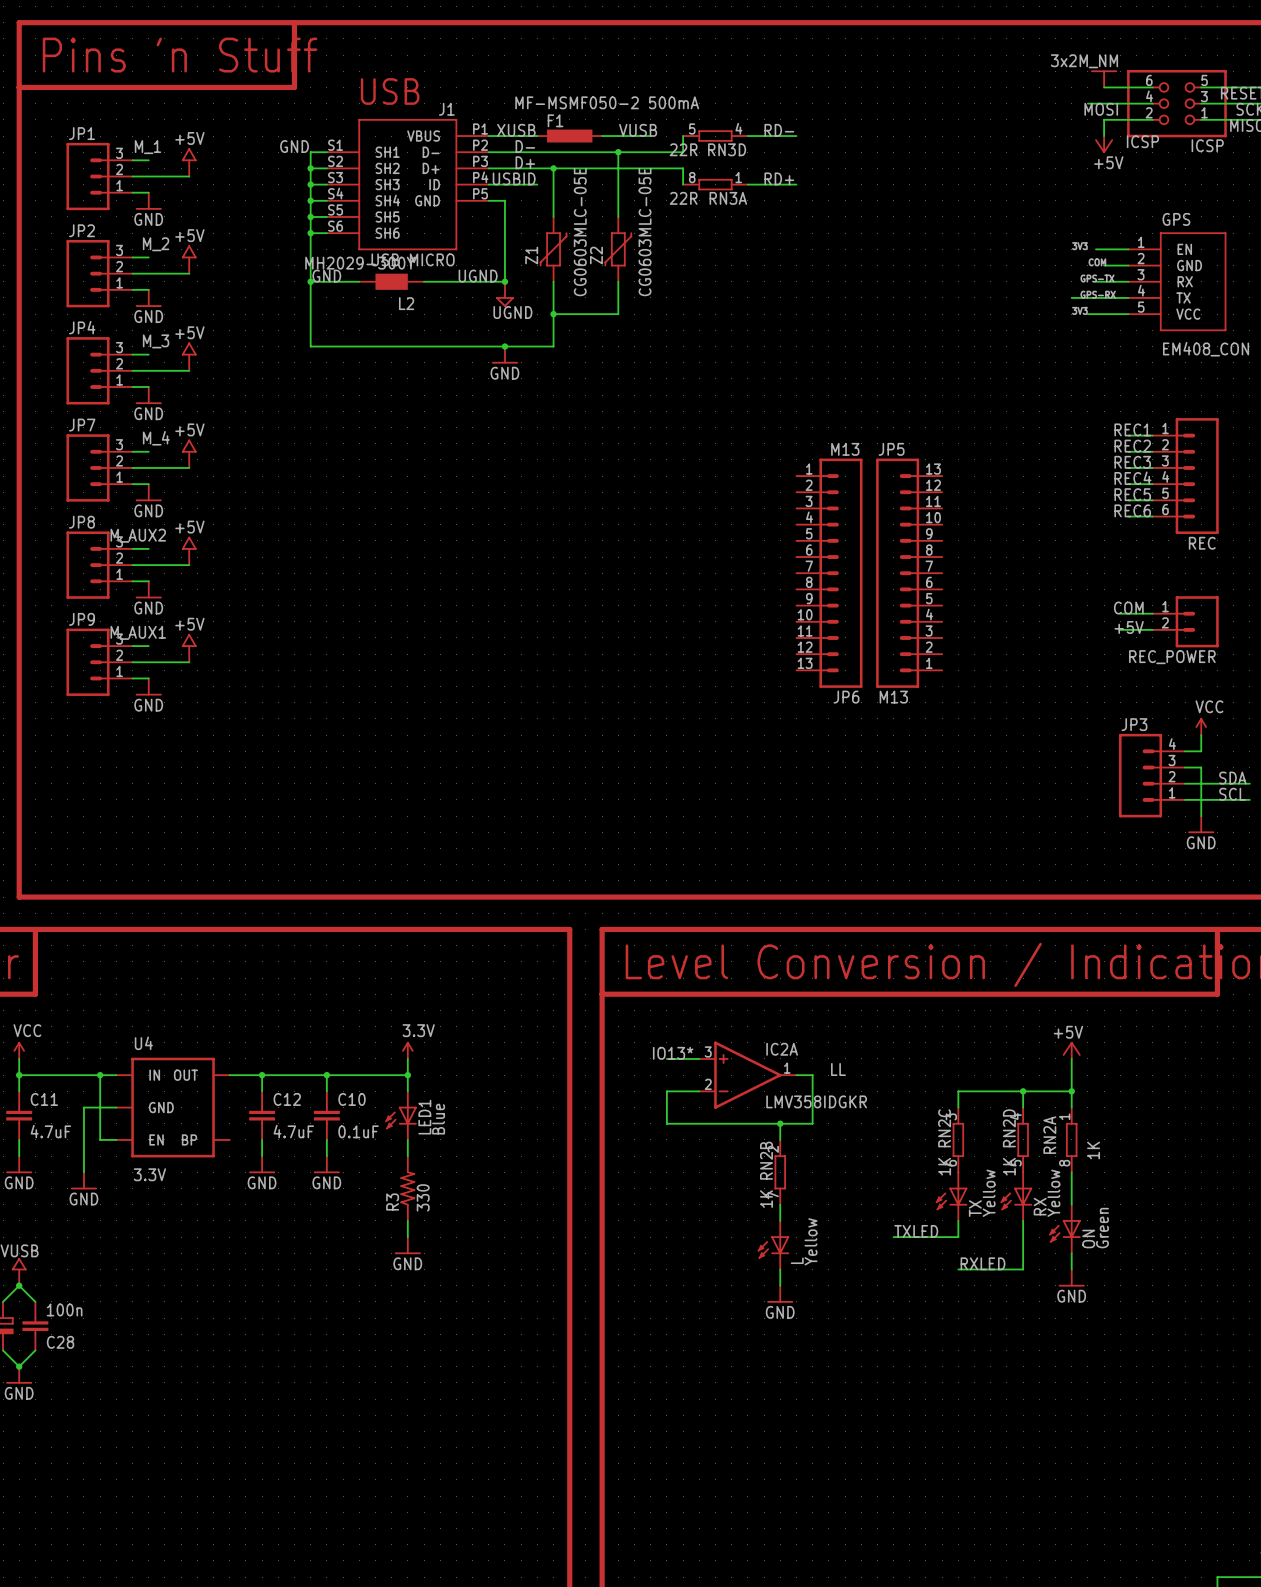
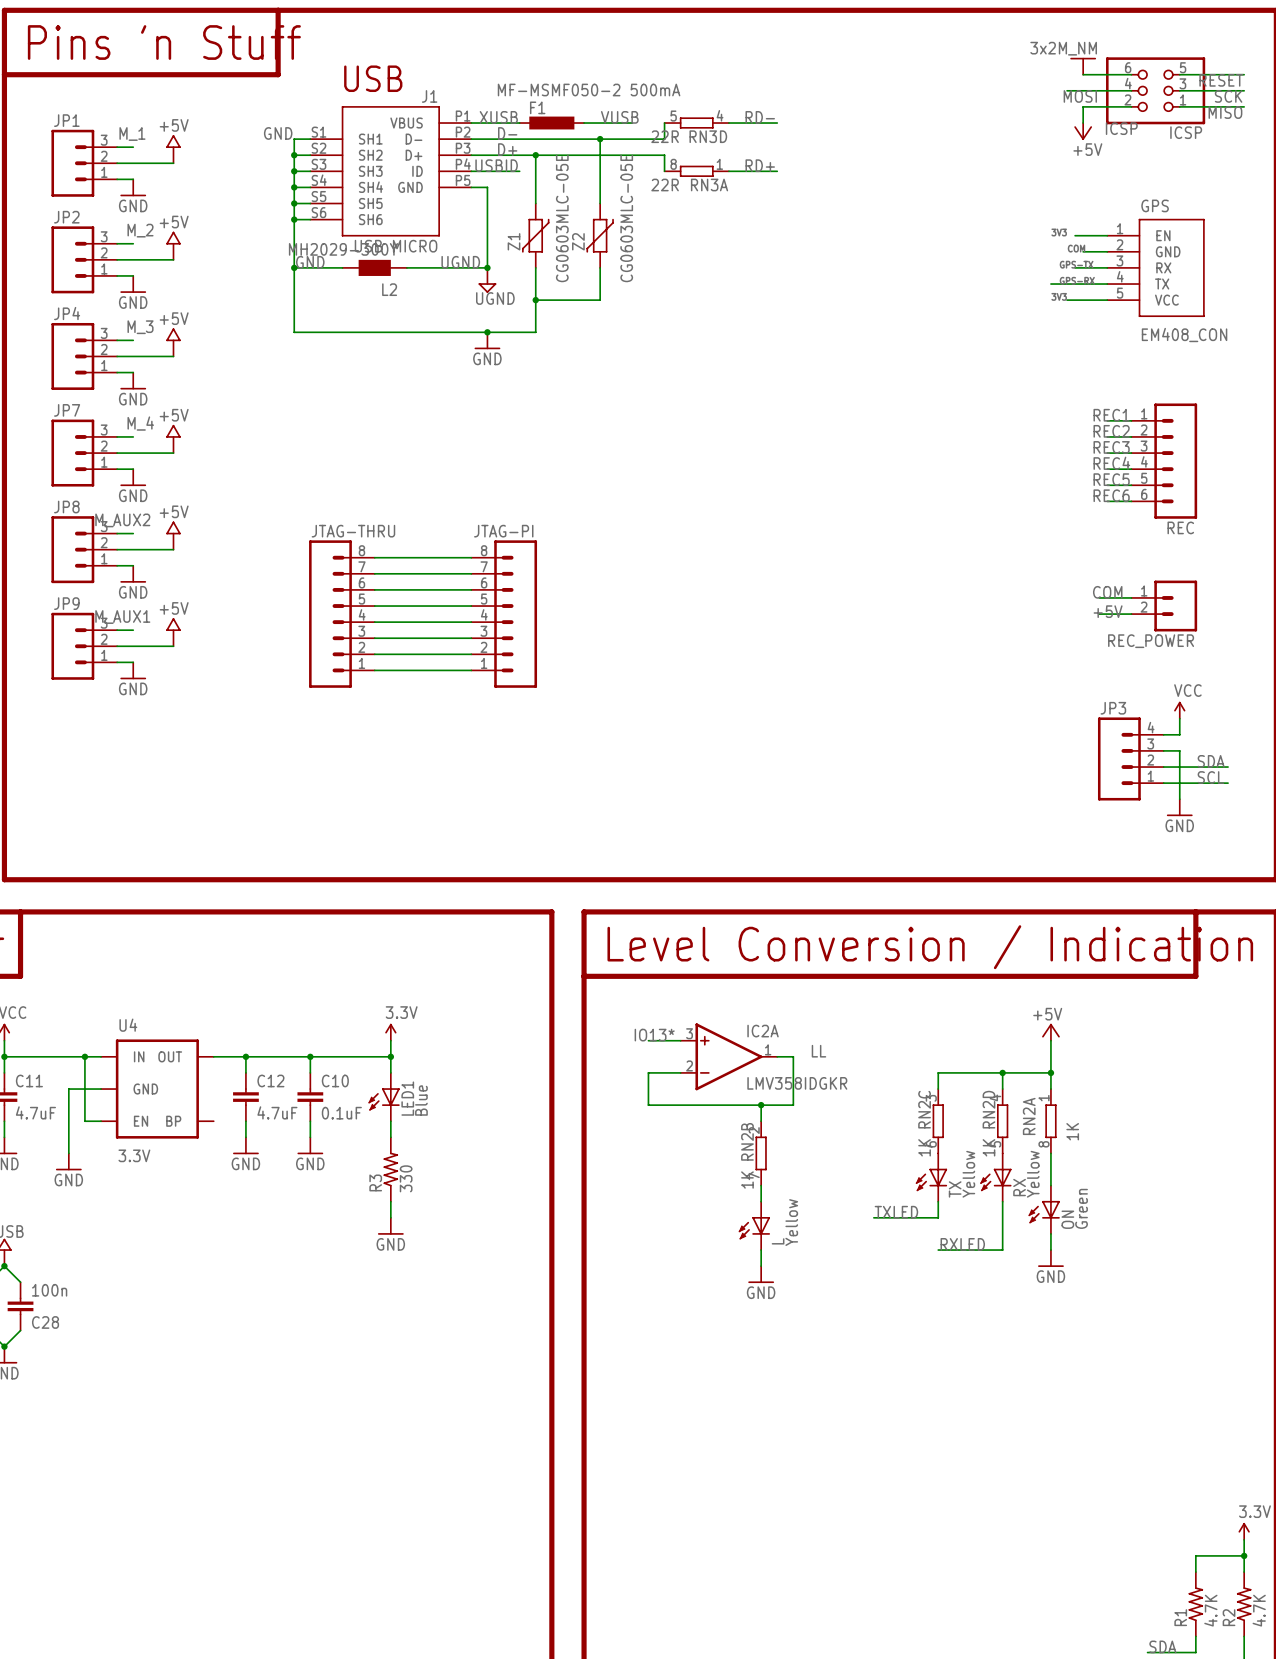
wire: none -> (374, 557) (471, 557)
JP6: M13 (829, 573) -> none
JP5: M13 (909, 573) -> none
wire: none -> (374, 573) (471, 573)
wire: none -> (374, 589) (471, 589)
wire: none -> (374, 606) (471, 606)
JTAG-THRU: none -> (341, 614)
JTAG-PI: none -> (504, 614)
wire: none -> (374, 622) (471, 622)
wire: none -> (374, 638) (471, 638)
wire: none -> (374, 654) (471, 654)
wire: none -> (374, 670) (471, 670)

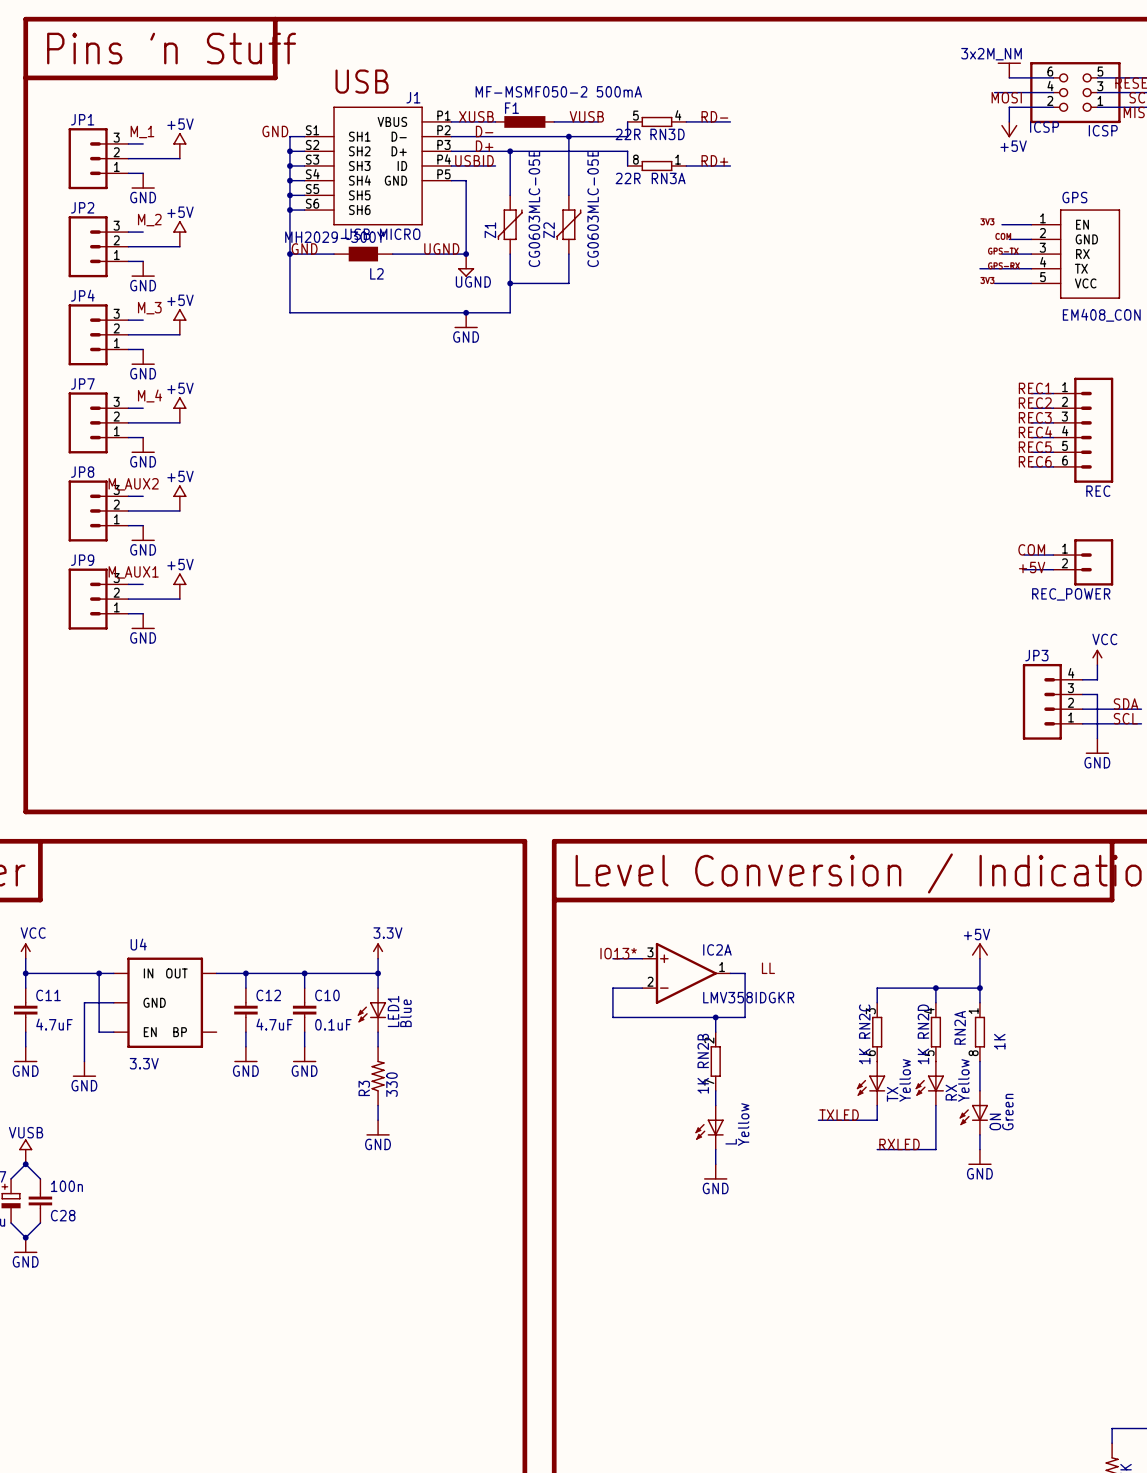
wire: (374, 557) (471, 557) -> none
wire: (374, 573) (471, 573) -> none
wire: (374, 589) (471, 589) -> none
wire: (374, 606) (471, 606) -> none
JTAG-THRU: (341, 614) -> none
JTAG-PI: (504, 614) -> none
wire: (374, 622) (471, 622) -> none
wire: (374, 638) (471, 638) -> none
wire: (374, 654) (471, 654) -> none
wire: (374, 670) (471, 670) -> none

